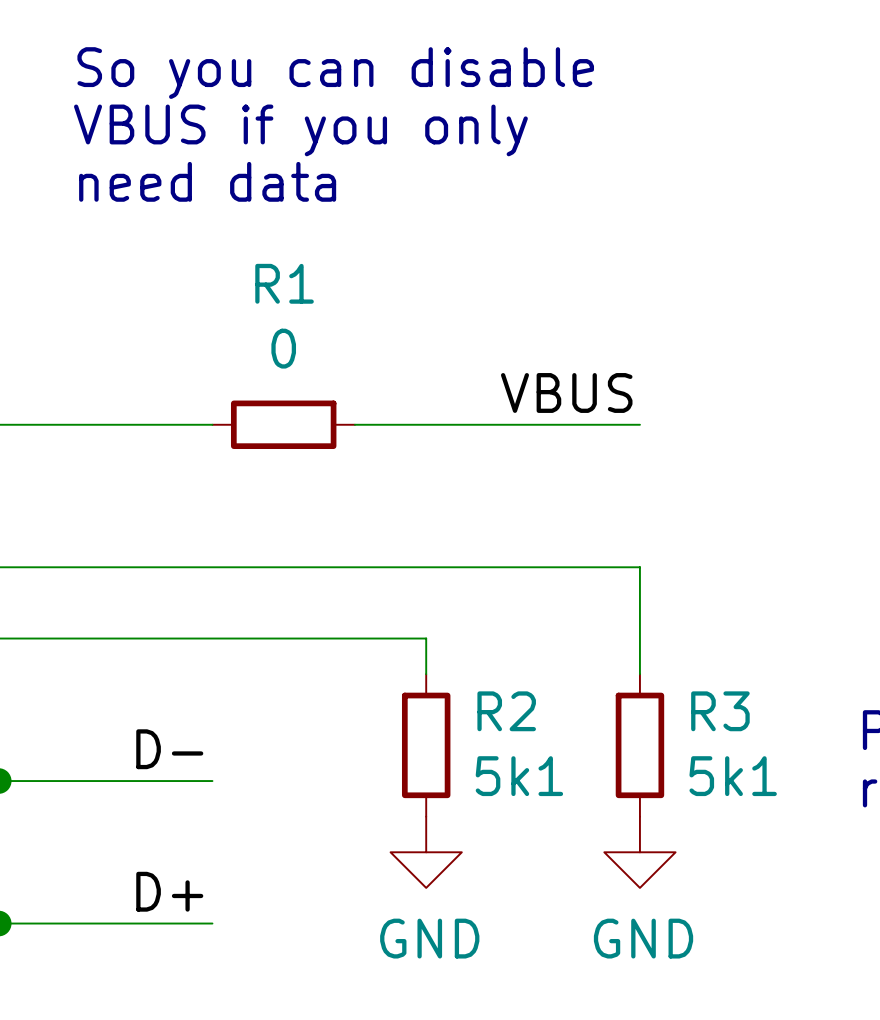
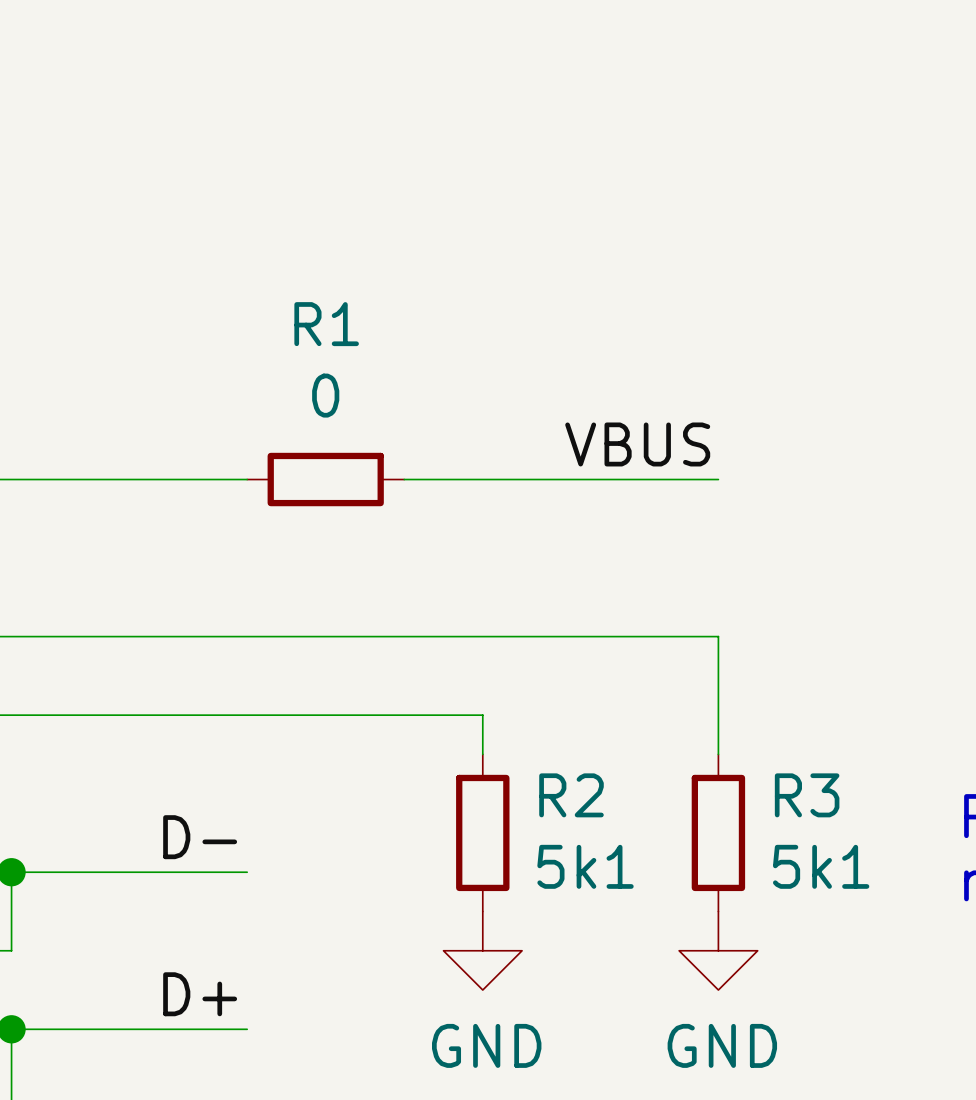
text: So you can disable (335, 73) -> none
text: VBUS if you only (300, 130) -> none
text: need data (207, 181) -> none

